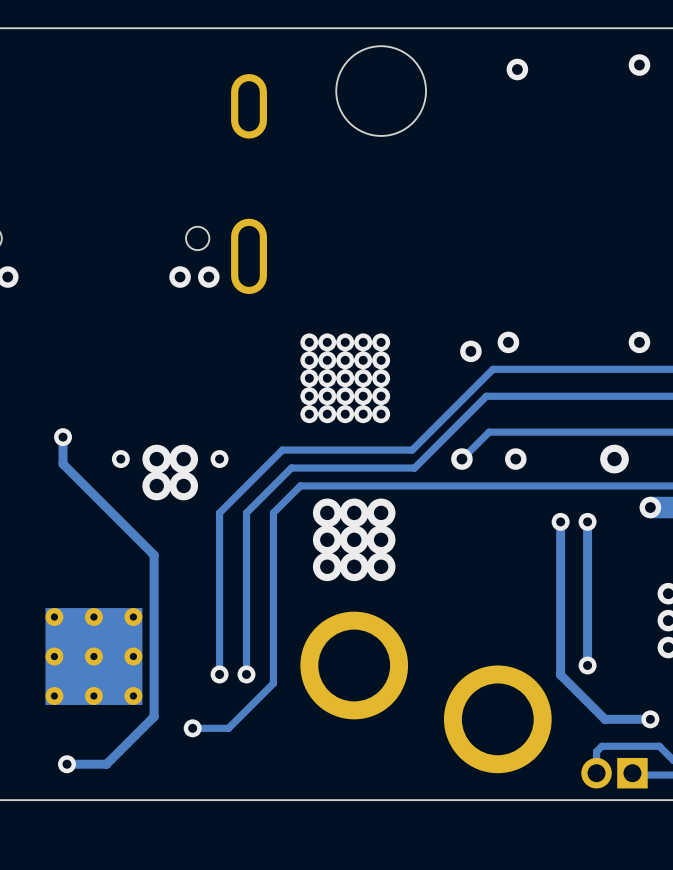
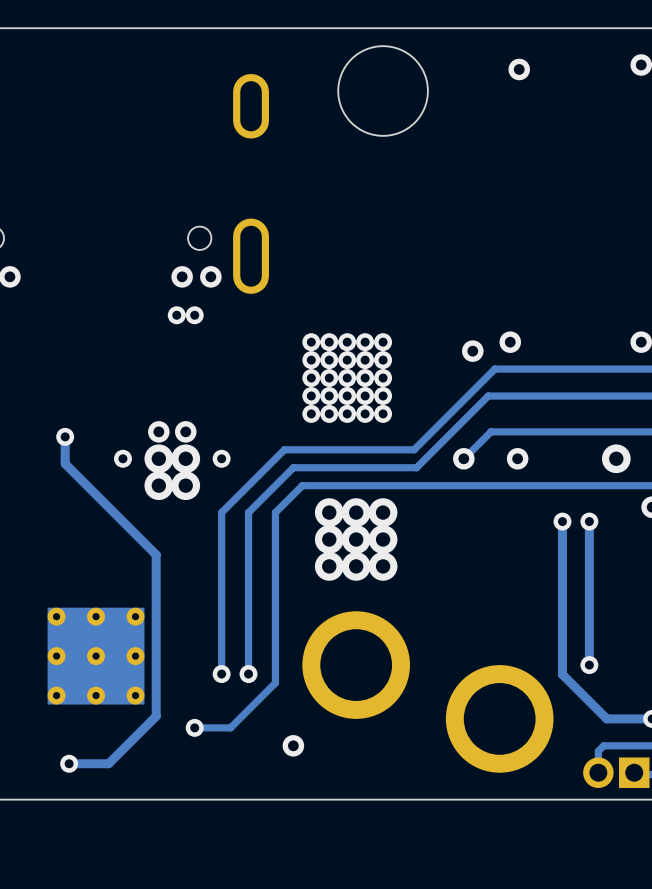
via: none -> (176, 315)
via: none -> (194, 315)
via: none -> (158, 431)
via: none -> (185, 431)
via: none -> (293, 745)

